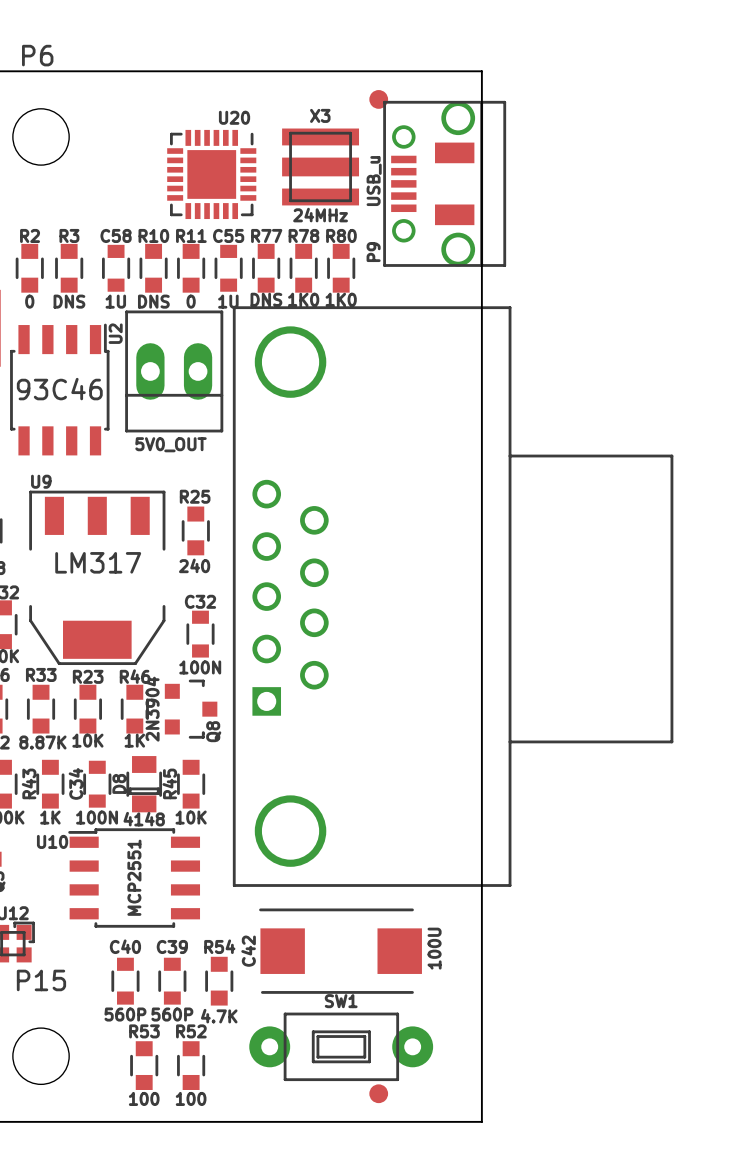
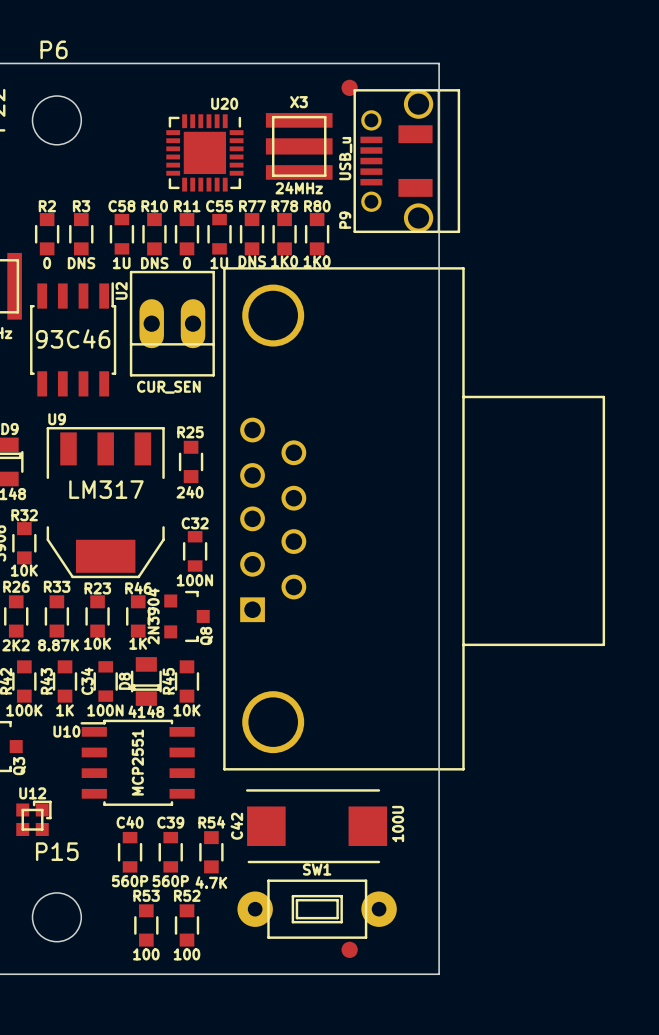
part value: 5V0_OUT (171, 444) -> CUR_SEN (168, 387)

